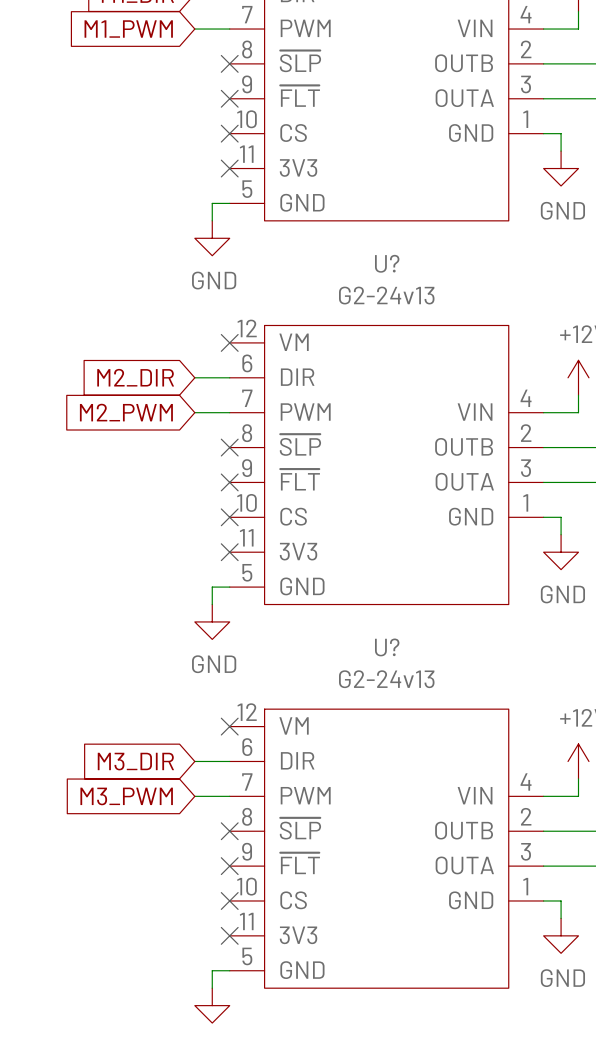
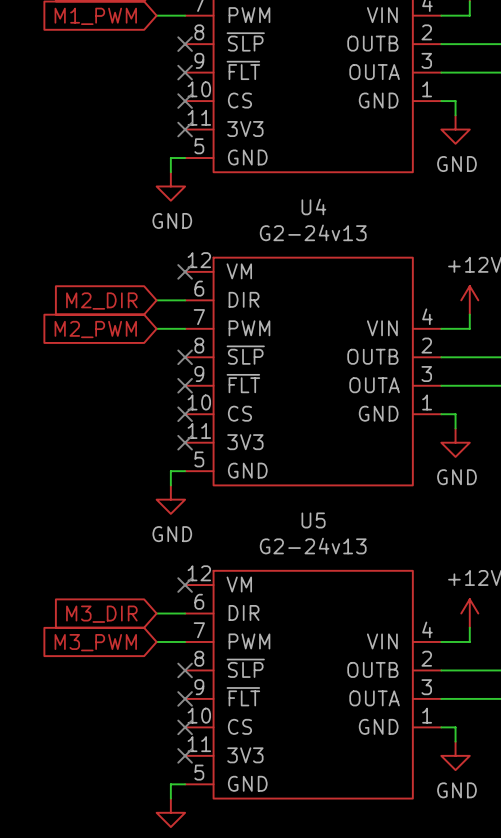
U? name: U? (387, 263) -> U4 (313, 206)
U? name: U? (387, 647) -> U5 (313, 520)

